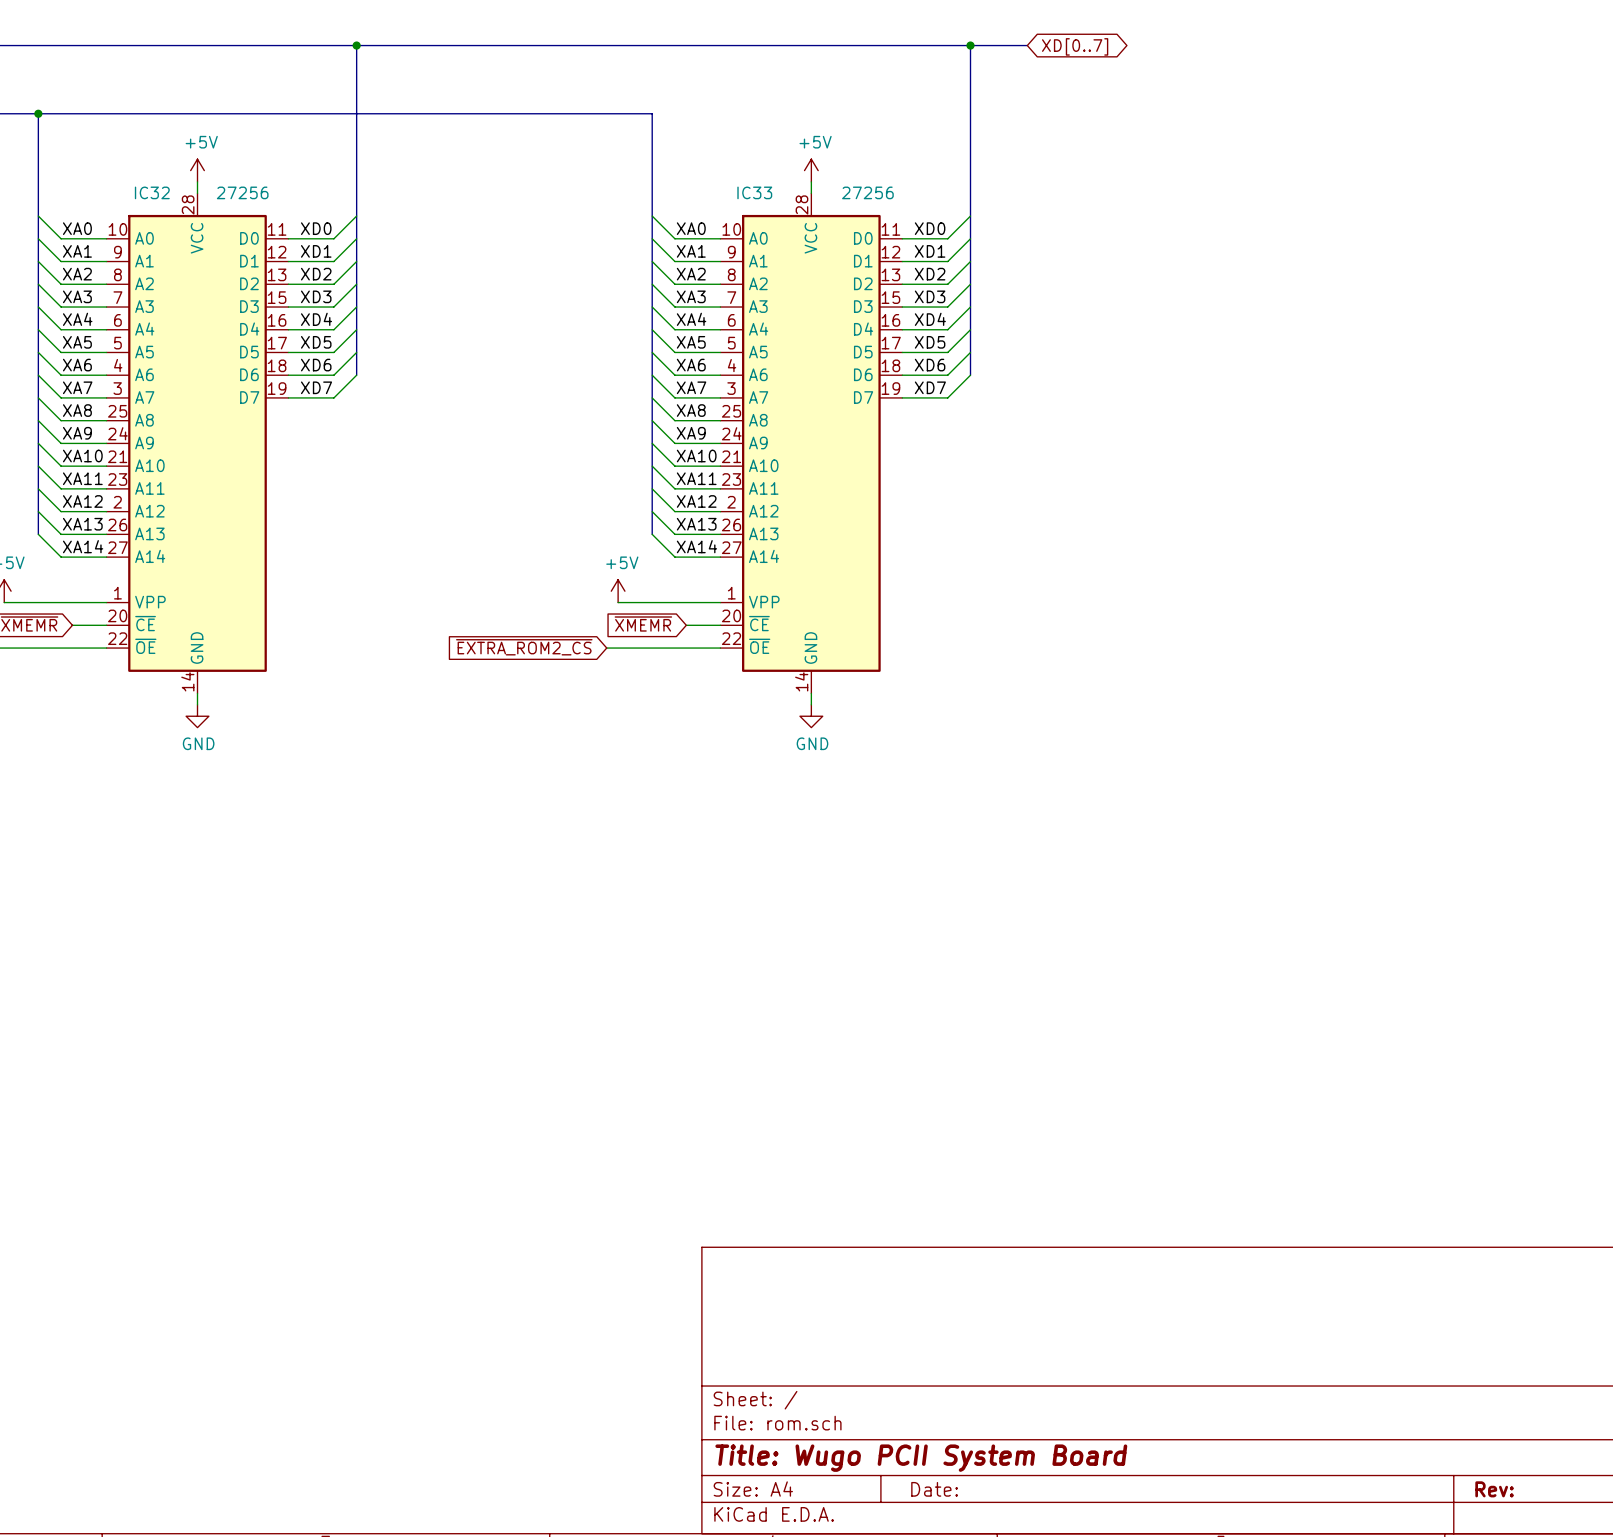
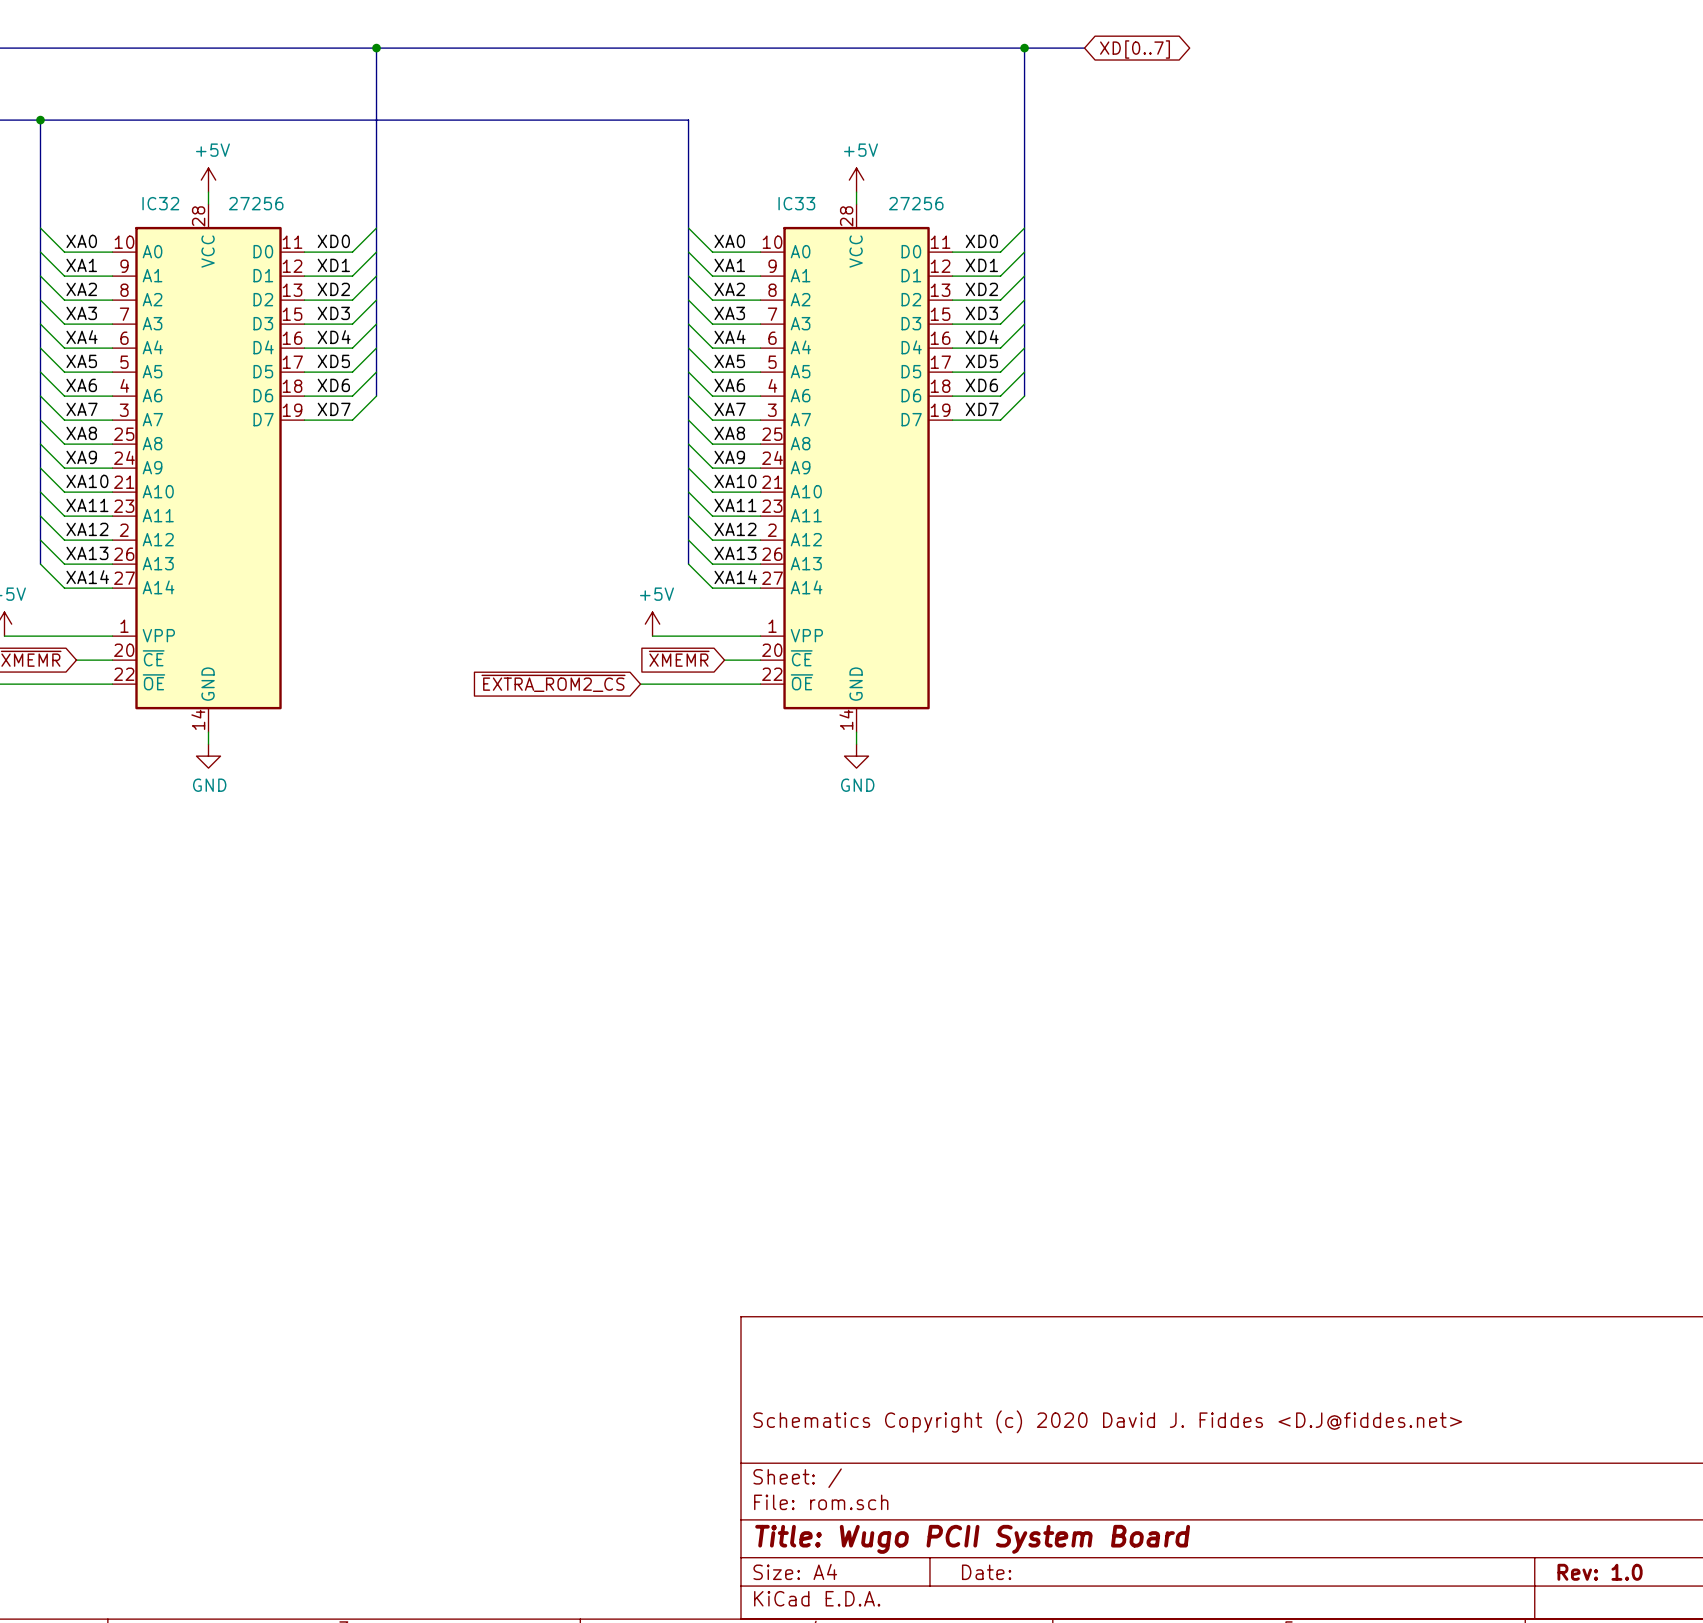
title block: none -> Schematics Copyright (c) 2020 David J. Fiddes <D.J@fiddes.net> (1107, 1421)
title block: Rev: (1494, 1489) -> Rev: 1.0 (1600, 1572)

